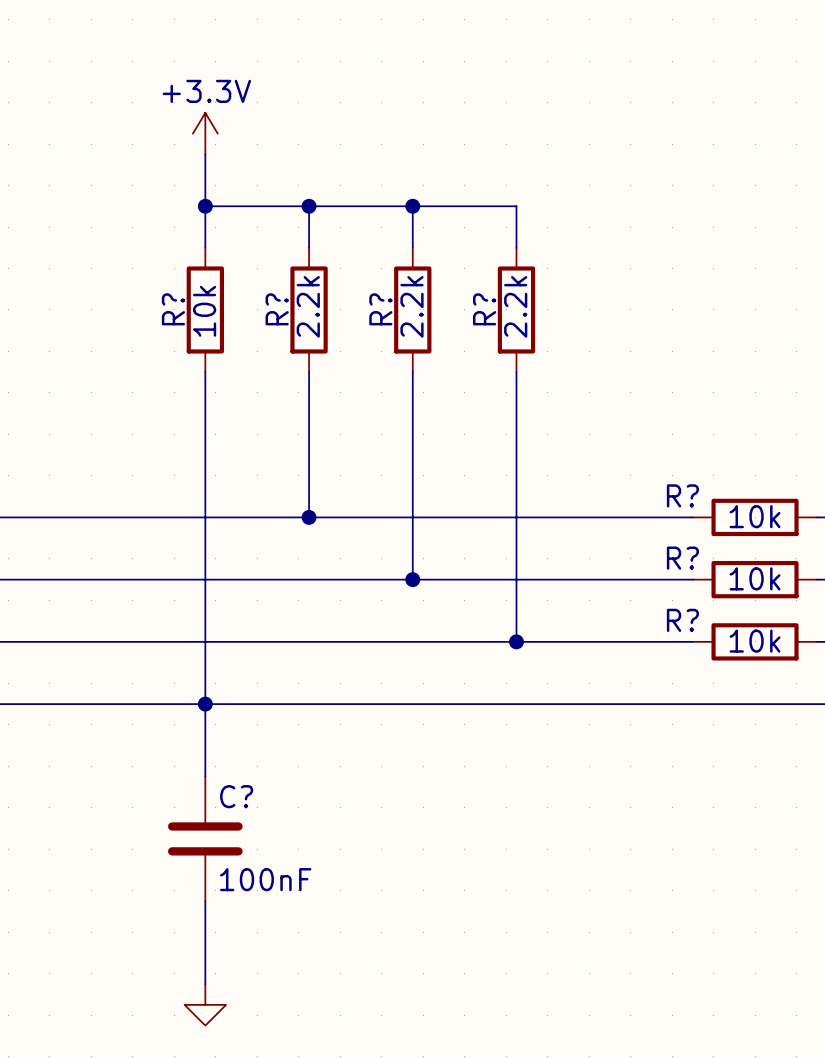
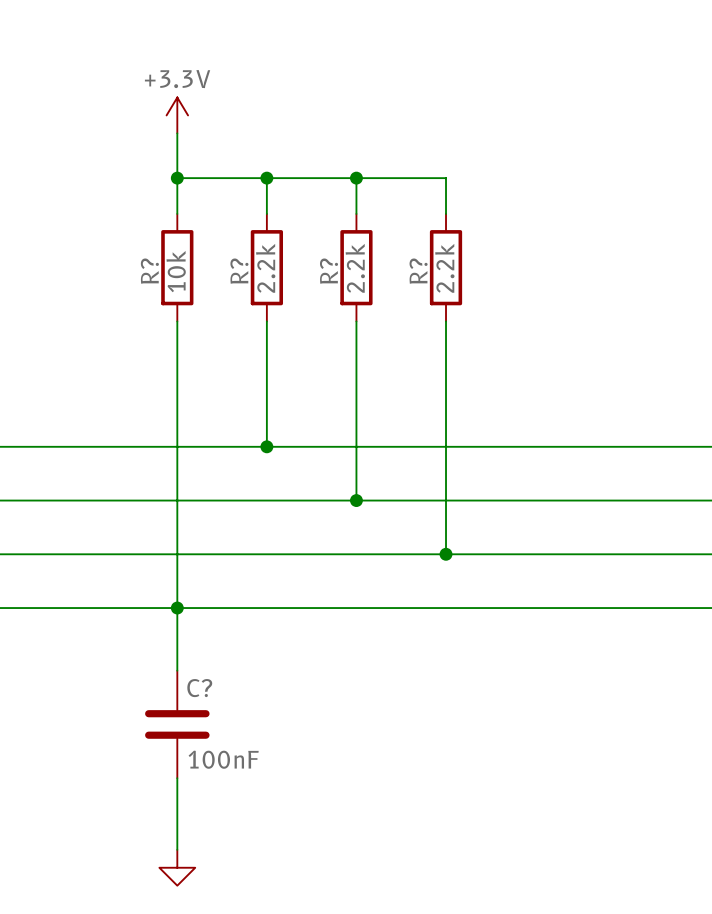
wire: none -> (598, 446) (705, 446)
R?: 10k (755, 517) -> none
wire: none -> (598, 500) (705, 500)
R?: 10k (755, 579) -> none
wire: none -> (598, 554) (705, 554)
R?: 10k (755, 641) -> none

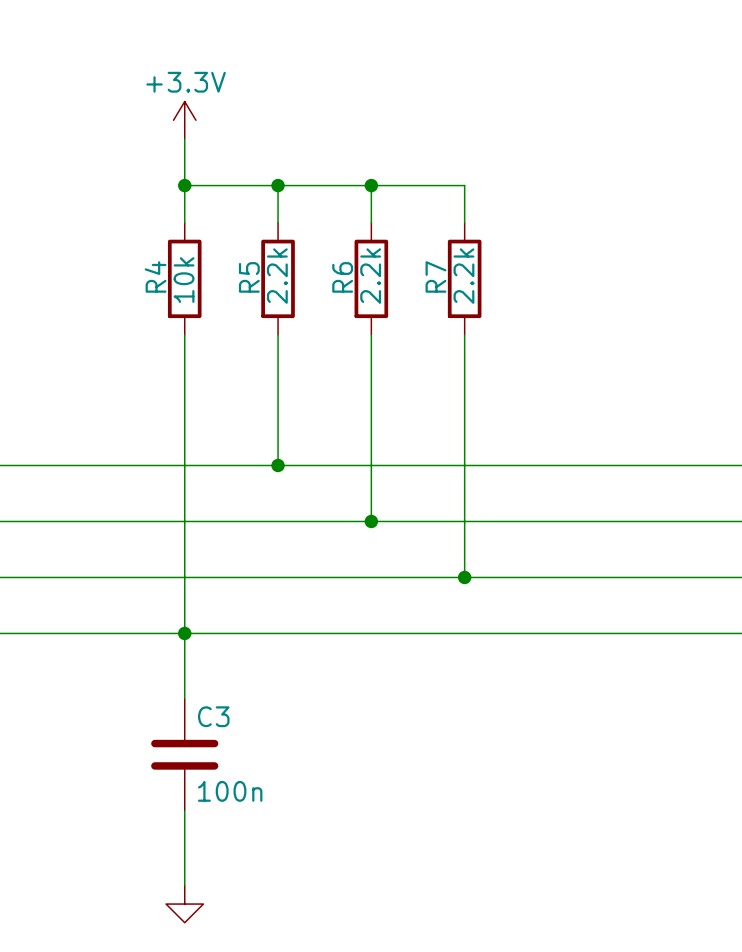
R? name: R? (149, 271) -> R4 (155, 276)
R? name: R? (239, 271) -> R5 (249, 277)
R? name: R? (329, 271) -> R6 (342, 277)
R? name: R? (418, 271) -> R7 (435, 276)
C? name: C? (199, 688) -> C3 (213, 716)
C? value: 100nF (223, 759) -> 100n (230, 791)

